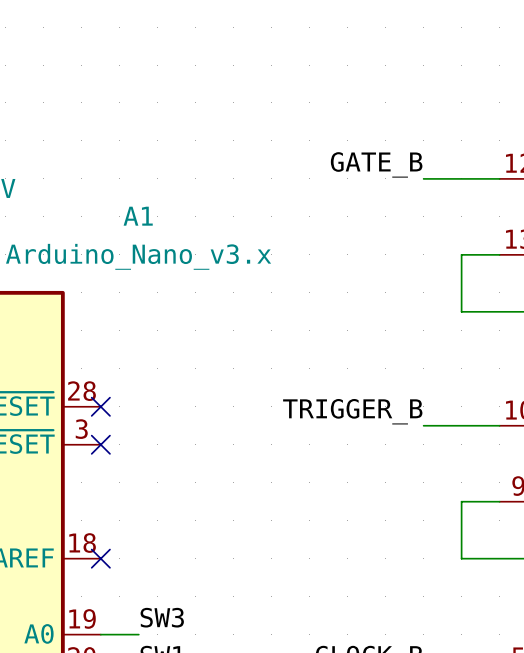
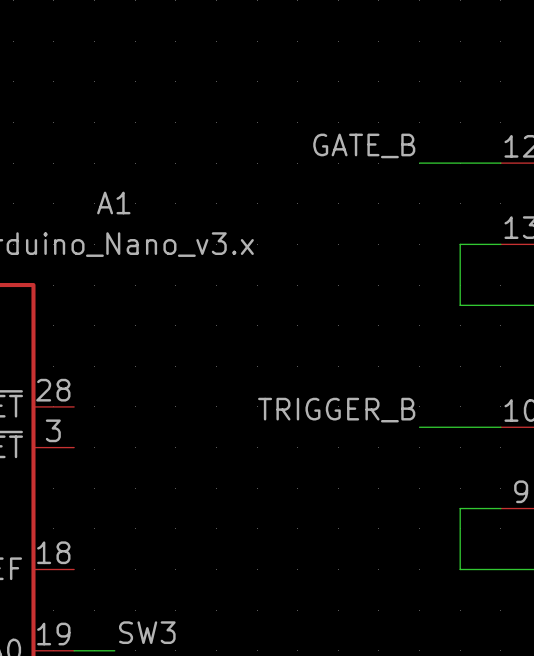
no-connect mark: (100, 406) -> none
no-connect mark: (100, 444) -> none
no-connect mark: (100, 558) -> none

